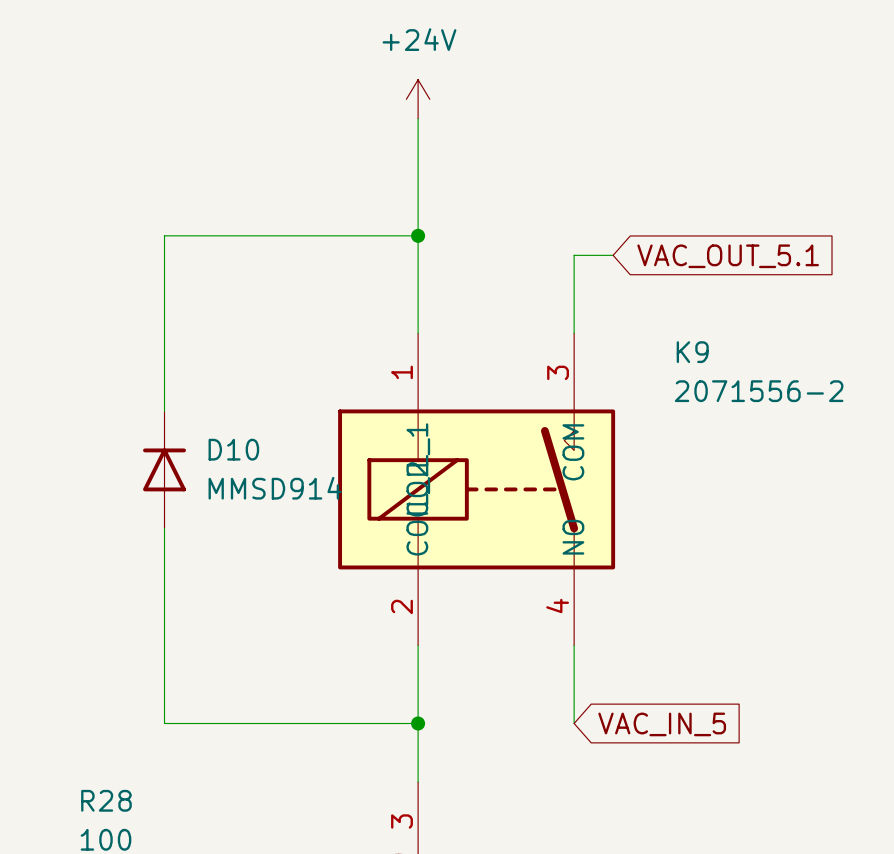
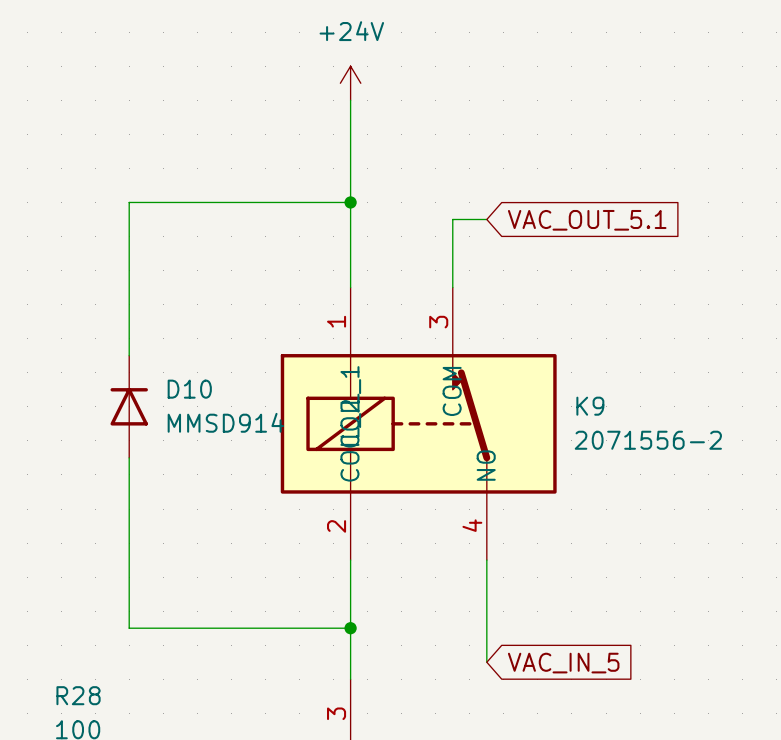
wire: (613, 255) (574, 255) (574, 333) -> (486, 219) (452, 219) (452, 287)
global label position: VAC_OUT_5.1 (728, 256) -> VAC_OUT_5.1 (587, 220)
K9 symbol: [338, 333, 616, 646] -> [280, 287, 557, 561]
K9 name position: K9 (692, 352) -> K9 (590, 406)
K9 value position: 2071556-2 (759, 391) -> 2071556-2 (648, 440)
wire: none -> (486, 628) (486, 662)
global label position: VAC_IN_5 (662, 724) -> VAC_IN_5 (563, 663)

